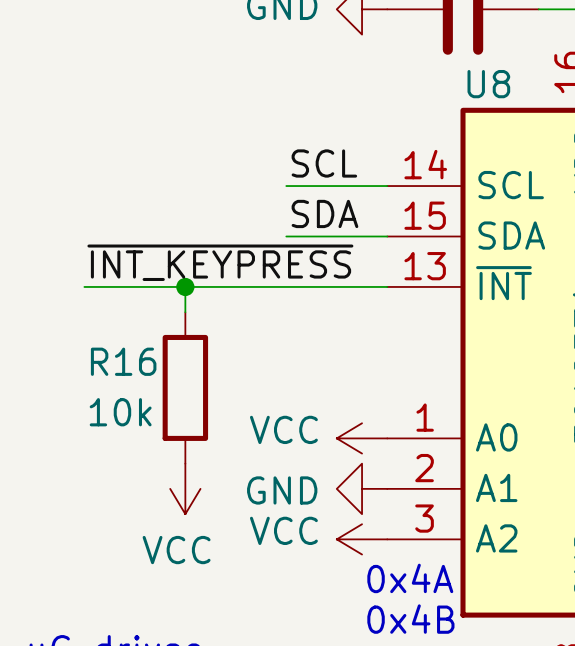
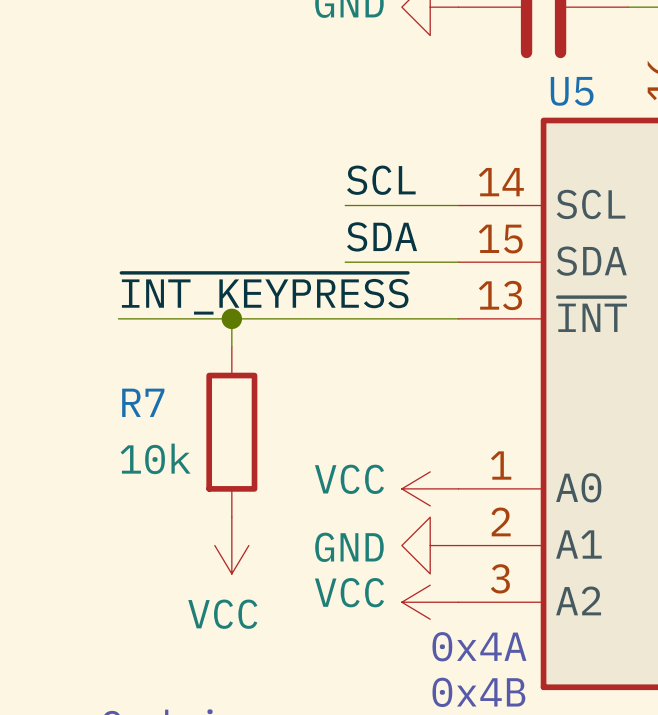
U8 name: U8 (488, 84) -> U5 (572, 91)
R16 name: R16 (123, 361) -> R7 (143, 402)

